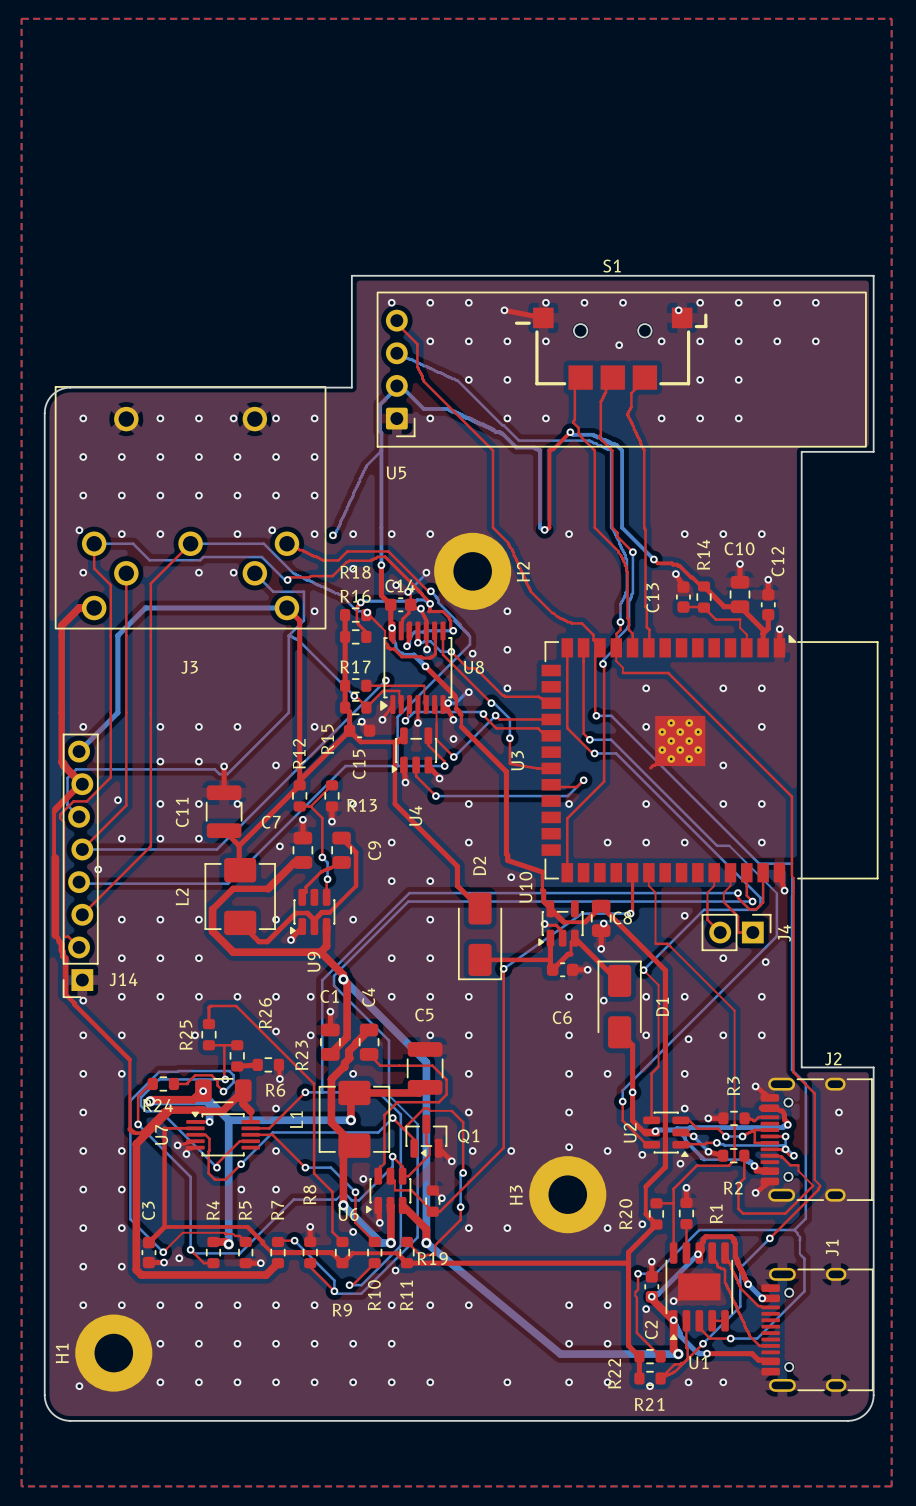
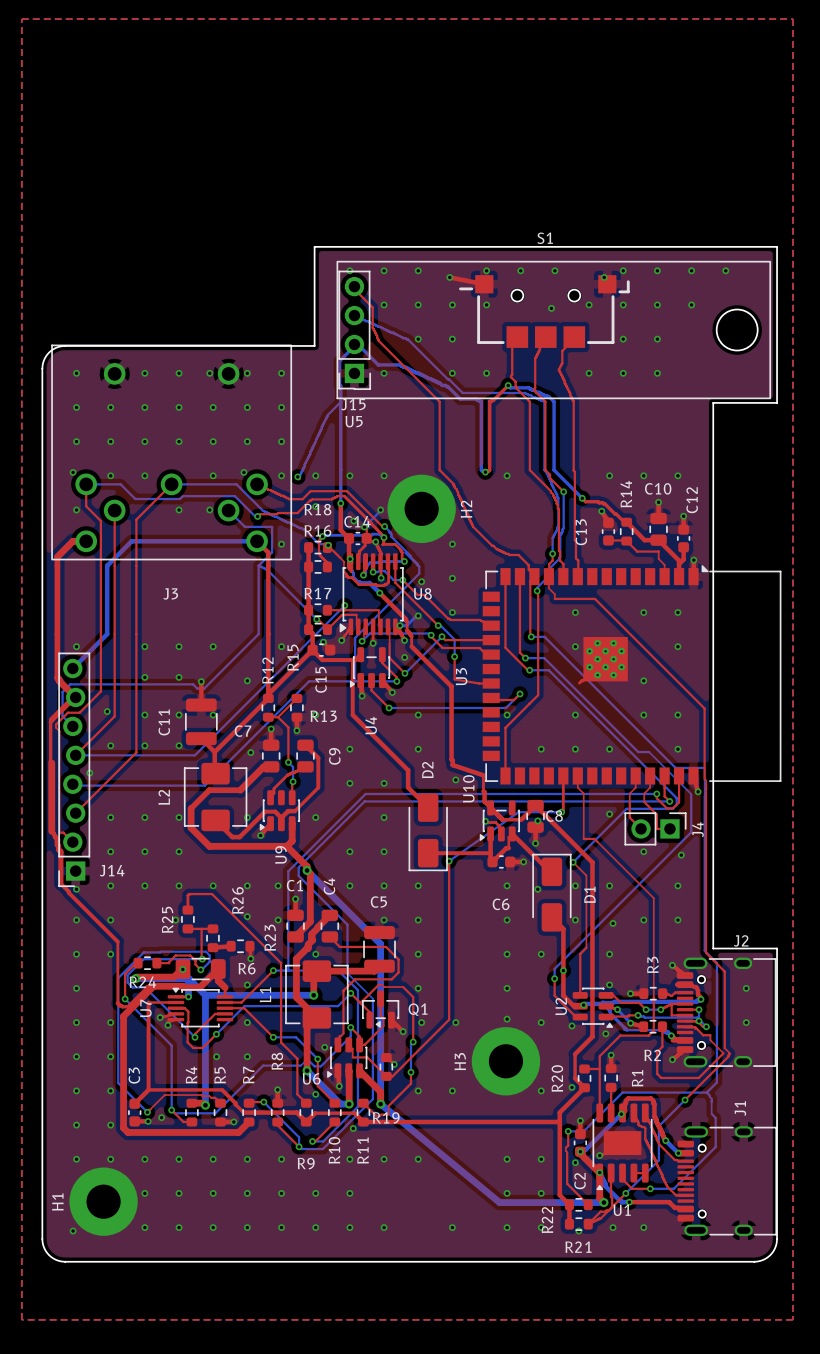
U5 footprint: [376, 291, 867, 448] -> [336, 260, 771, 400]
via: (815, 341) -> none
round board edge: none -> [716, 309, 758, 351]
J15: none -> (354, 330)

